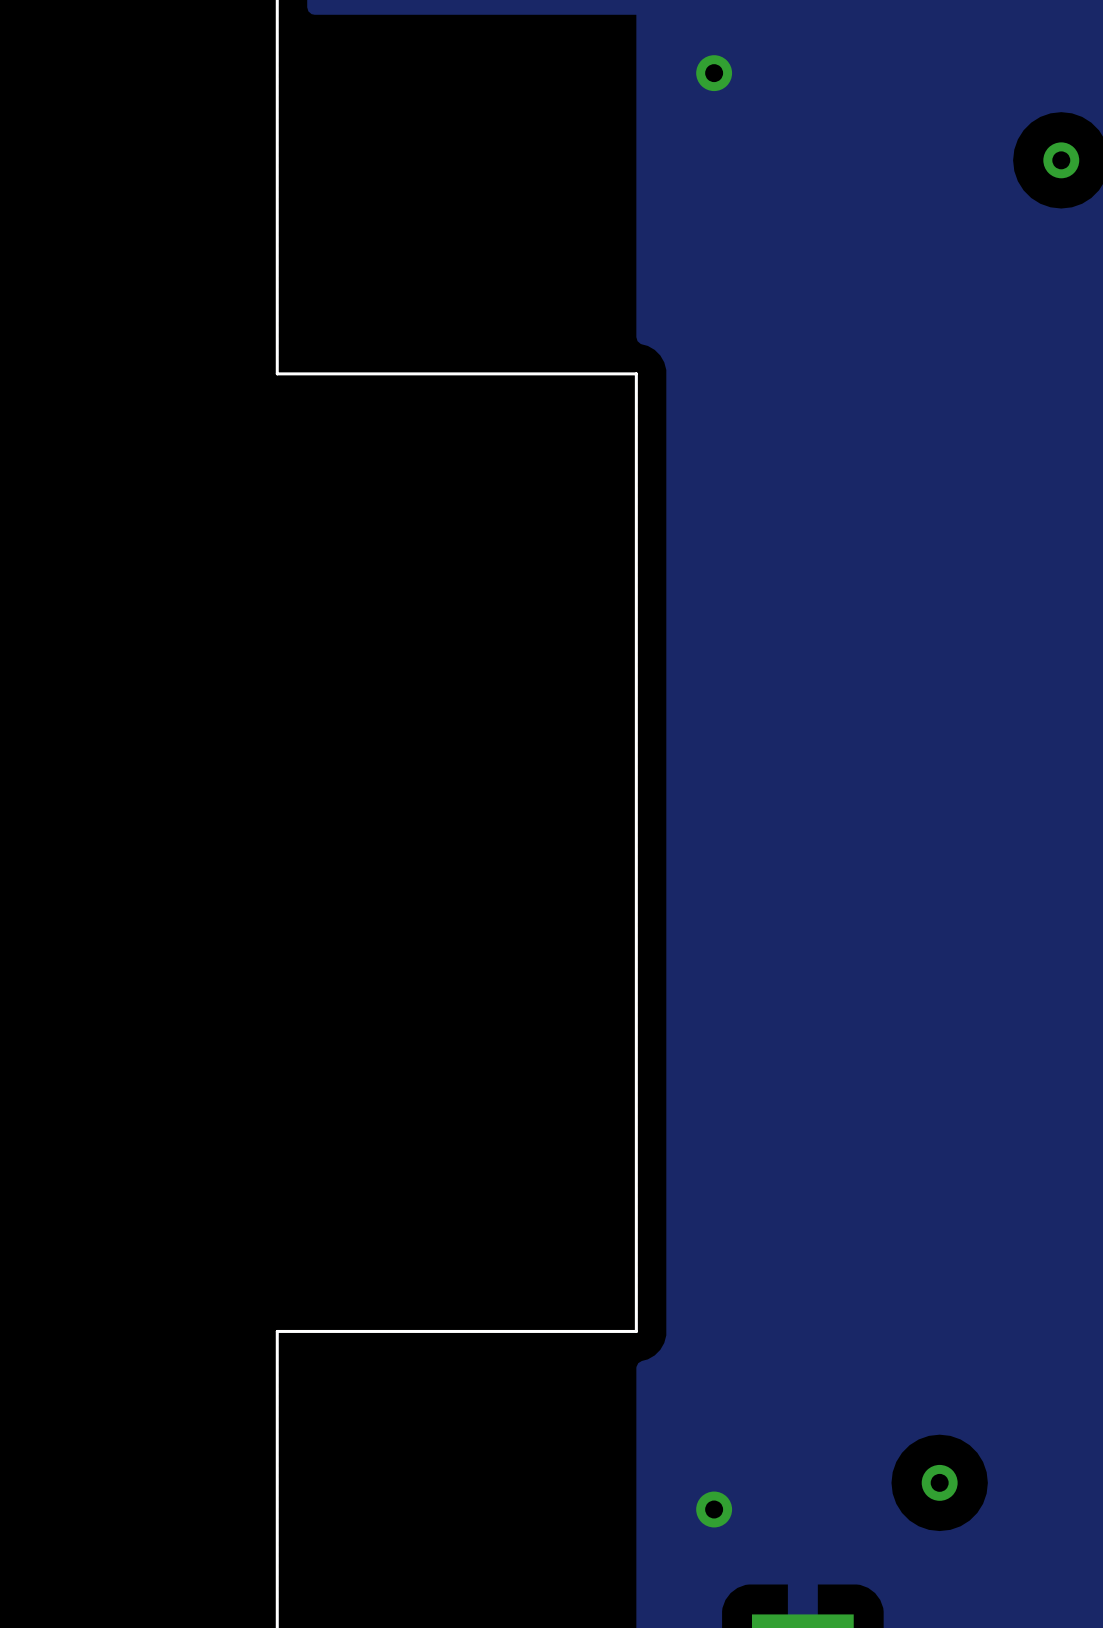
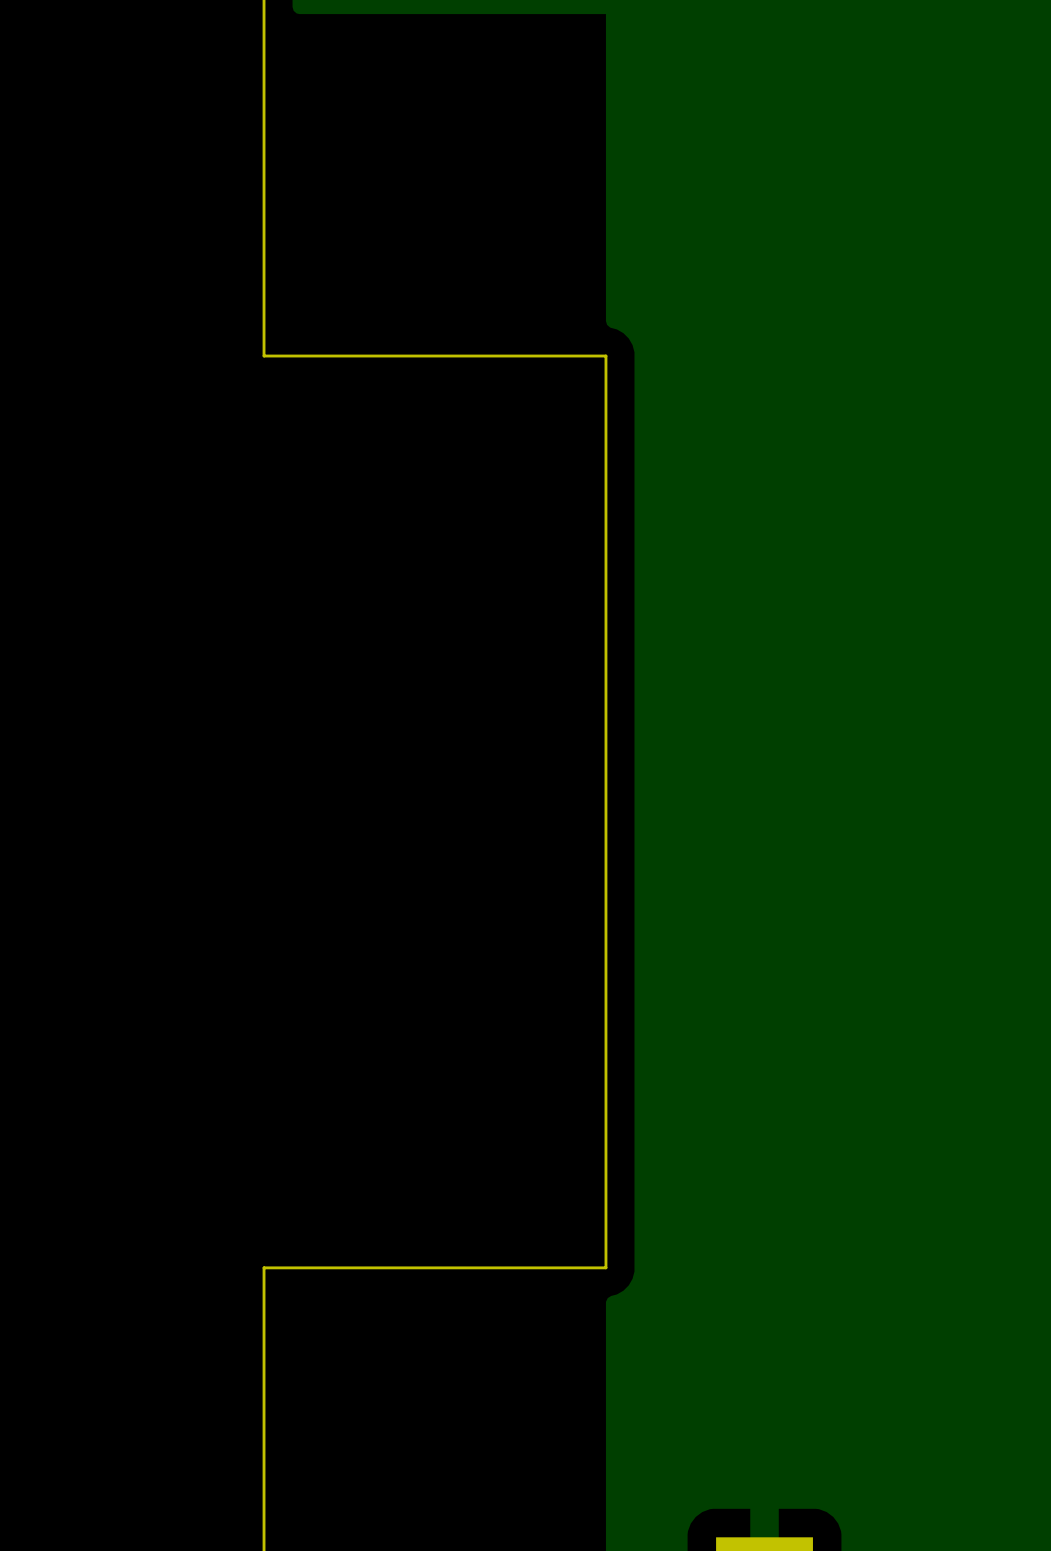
via: (714, 73) -> none
via: (1061, 160) -> none
via: (939, 1482) -> none
via: (714, 1509) -> none

